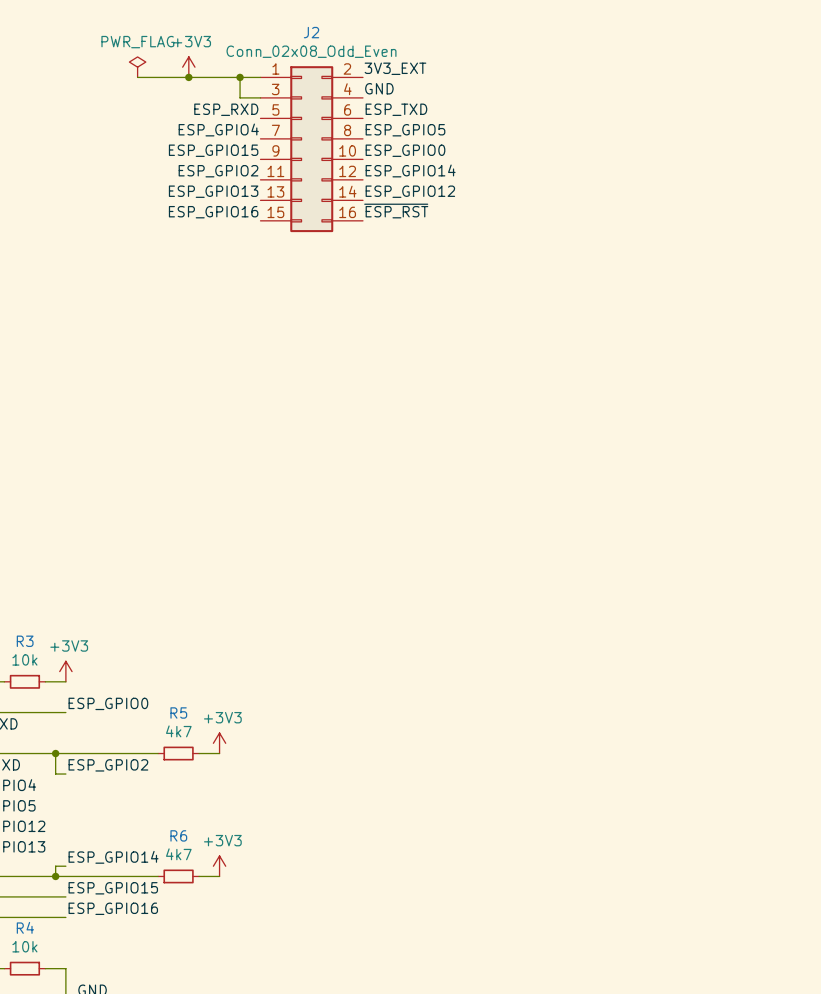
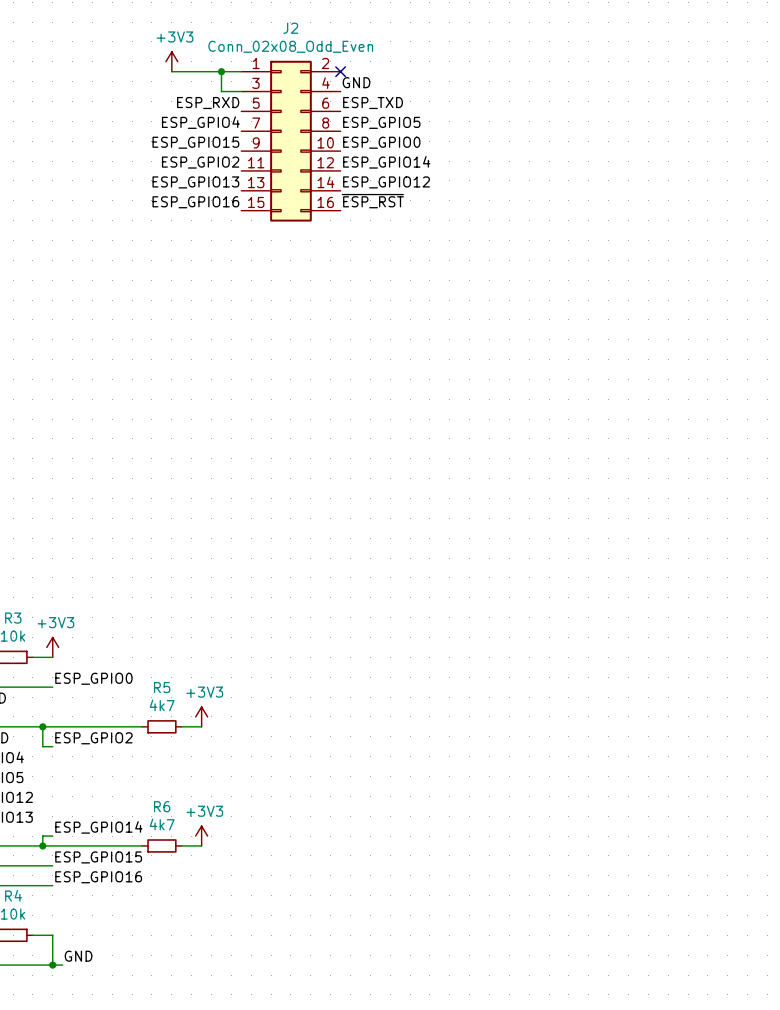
power symbol: PWR_FLAG (137, 67) -> none
label: 3V3_EXT (395, 68) -> none
wire: (137, 77) (188, 77) -> none
junction: (188, 77) -> none
no-connect mark: none -> (340, 71)

